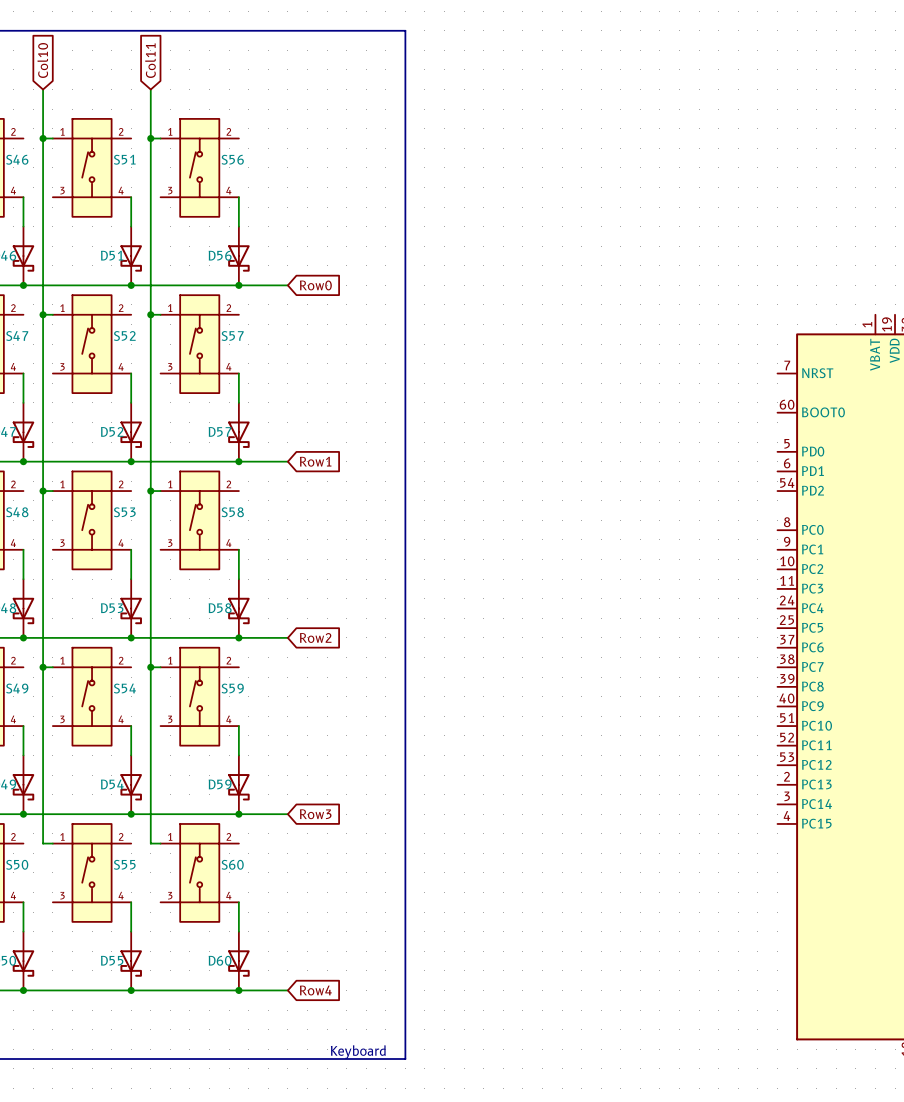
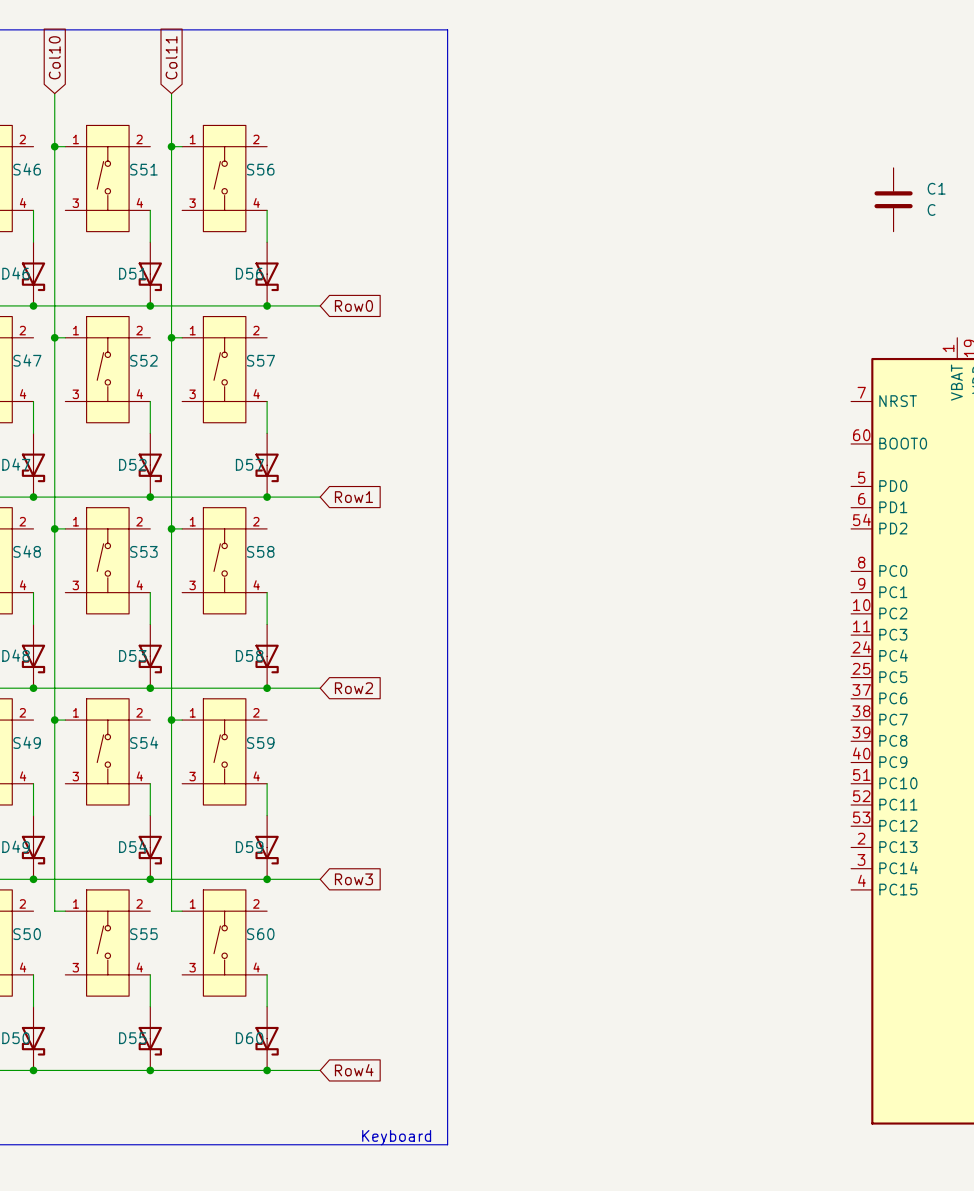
C1: none -> C (893, 199)

